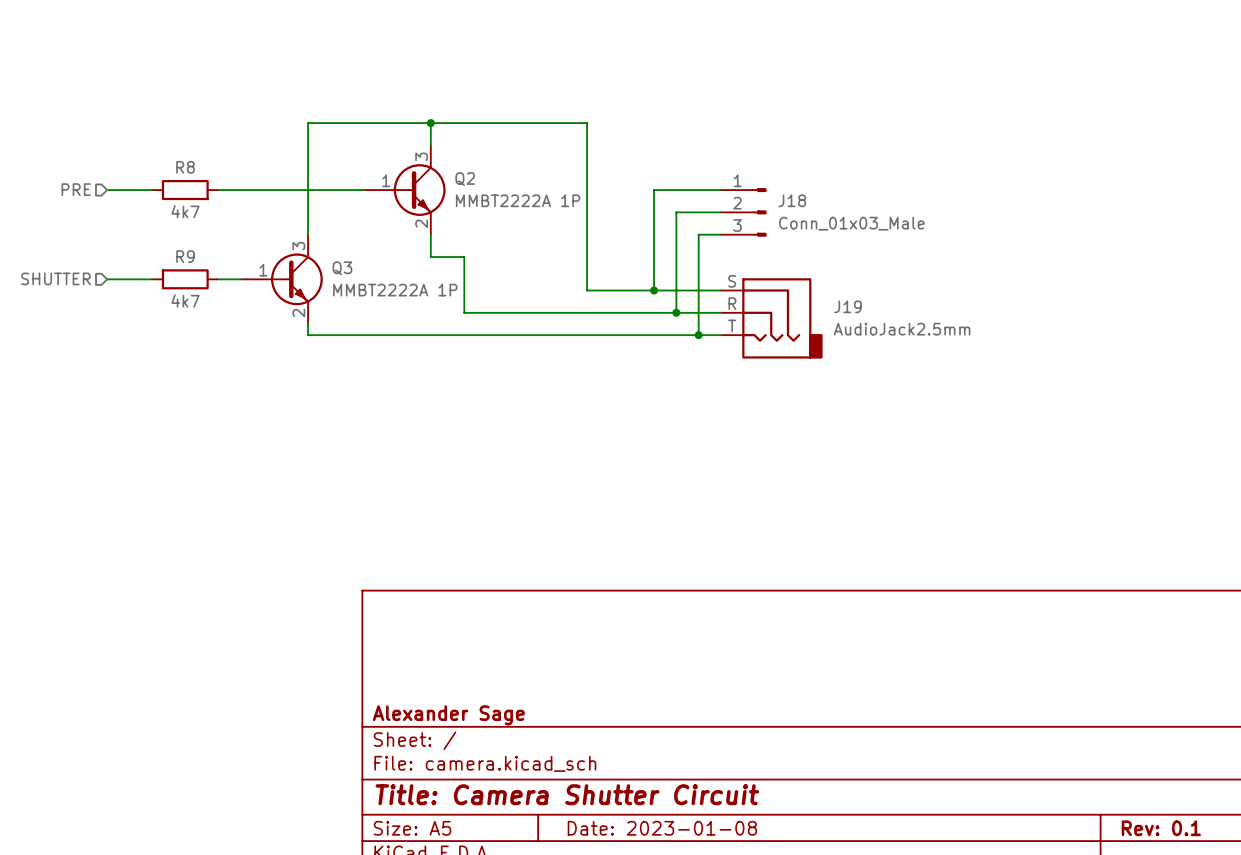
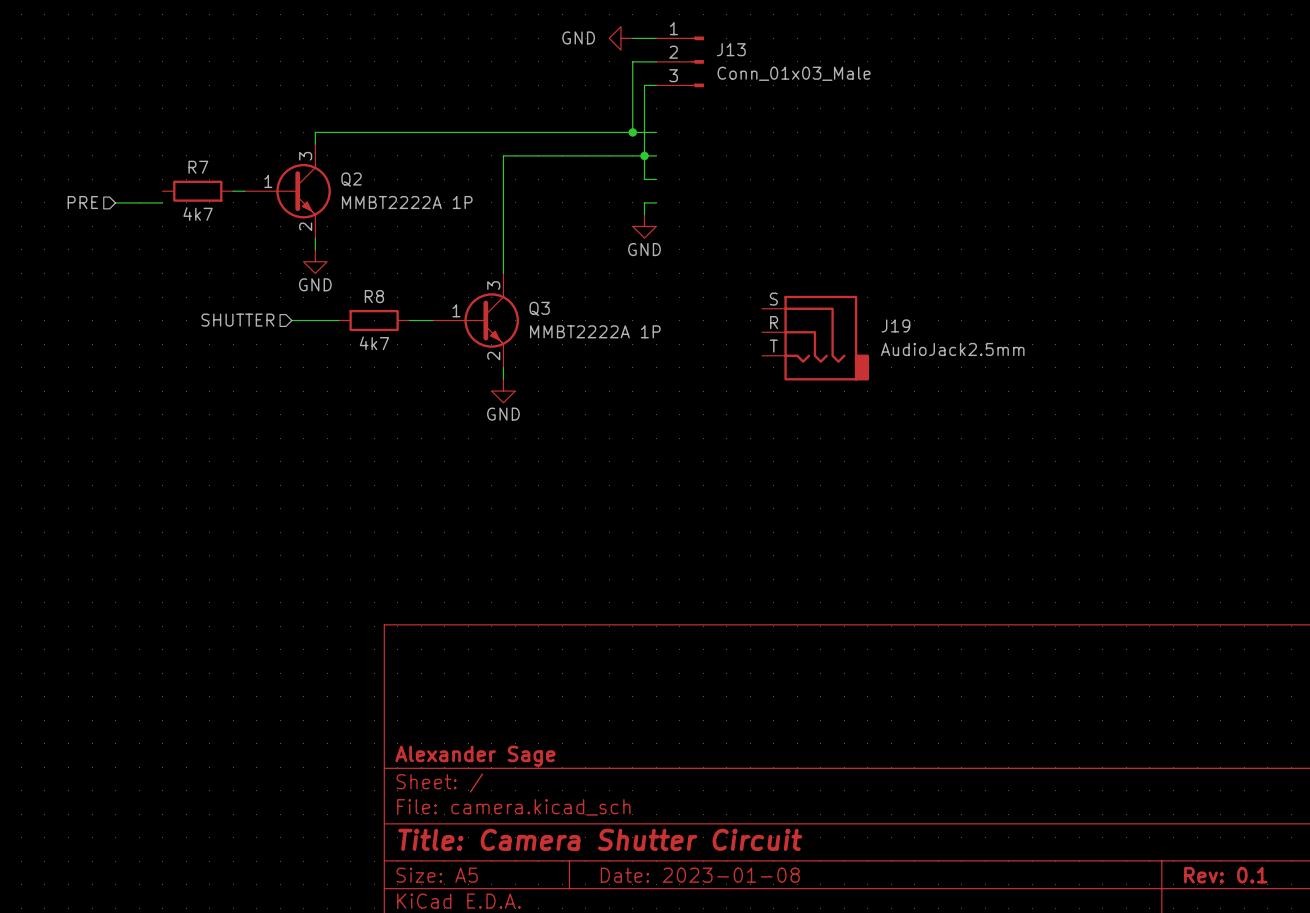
power symbol: none -> GND (620, 38)
wire: none -> (632, 38) (656, 38)
wire: none -> (656, 61) (632, 61) (632, 132)
J13: none -> Conn_01x03_Male (680, 61)
wire: none -> (656, 85) (644, 85) (644, 179) (656, 179)
wire: (308, 123) (308, 234) -> (327, 132) (315, 132) (315, 144)
wire: (430, 123) (430, 145) -> none
junction: (430, 123) -> none
wire: (587, 123) (587, 290) (721, 290) -> (620, 132) (656, 132)
junction: none -> (632, 132)
junction: none -> (644, 155)
wire: none -> (656, 155) (503, 155) (503, 273)
R7: none -> 4k7 (197, 191)
wire: none -> (233, 191) (244, 191)
R8 position: (185, 190) -> (374, 320)
wire: (218, 190) (363, 190) -> none
Q2 position: (404, 190) -> (287, 191)
wire: none -> (656, 202) (644, 202) (644, 214)
wire: (721, 190) (654, 190) (654, 290) -> none
power symbol: none -> GND (644, 226)
wire: (721, 212) (676, 212) (676, 312) -> none
J18: Conn_01x03_Male (743, 212) -> none
wire: none -> (315, 238) (315, 249)
wire: (430, 234) (430, 257) (464, 257) (464, 312) (721, 312) -> none
wire: (721, 234) (698, 234) (698, 335) -> none
power symbol: none -> GND (315, 261)
hierarchical label position: SHUTTER (55, 278) -> SHUTTER (237, 320)
wire: (107, 279) (151, 279) -> (291, 320) (338, 320)
R9: 4k7 (185, 279) -> none
wire: (218, 279) (241, 279) -> (409, 320) (432, 320)
Q3 position: (281, 279) -> (475, 320)
junction: (654, 290) -> none
junction: (676, 312) -> none
wire: (308, 323) (308, 335) (721, 335) -> none
junction: (698, 335) -> none
wire: none -> (503, 367) (503, 379)
power symbol: none -> GND (503, 391)

